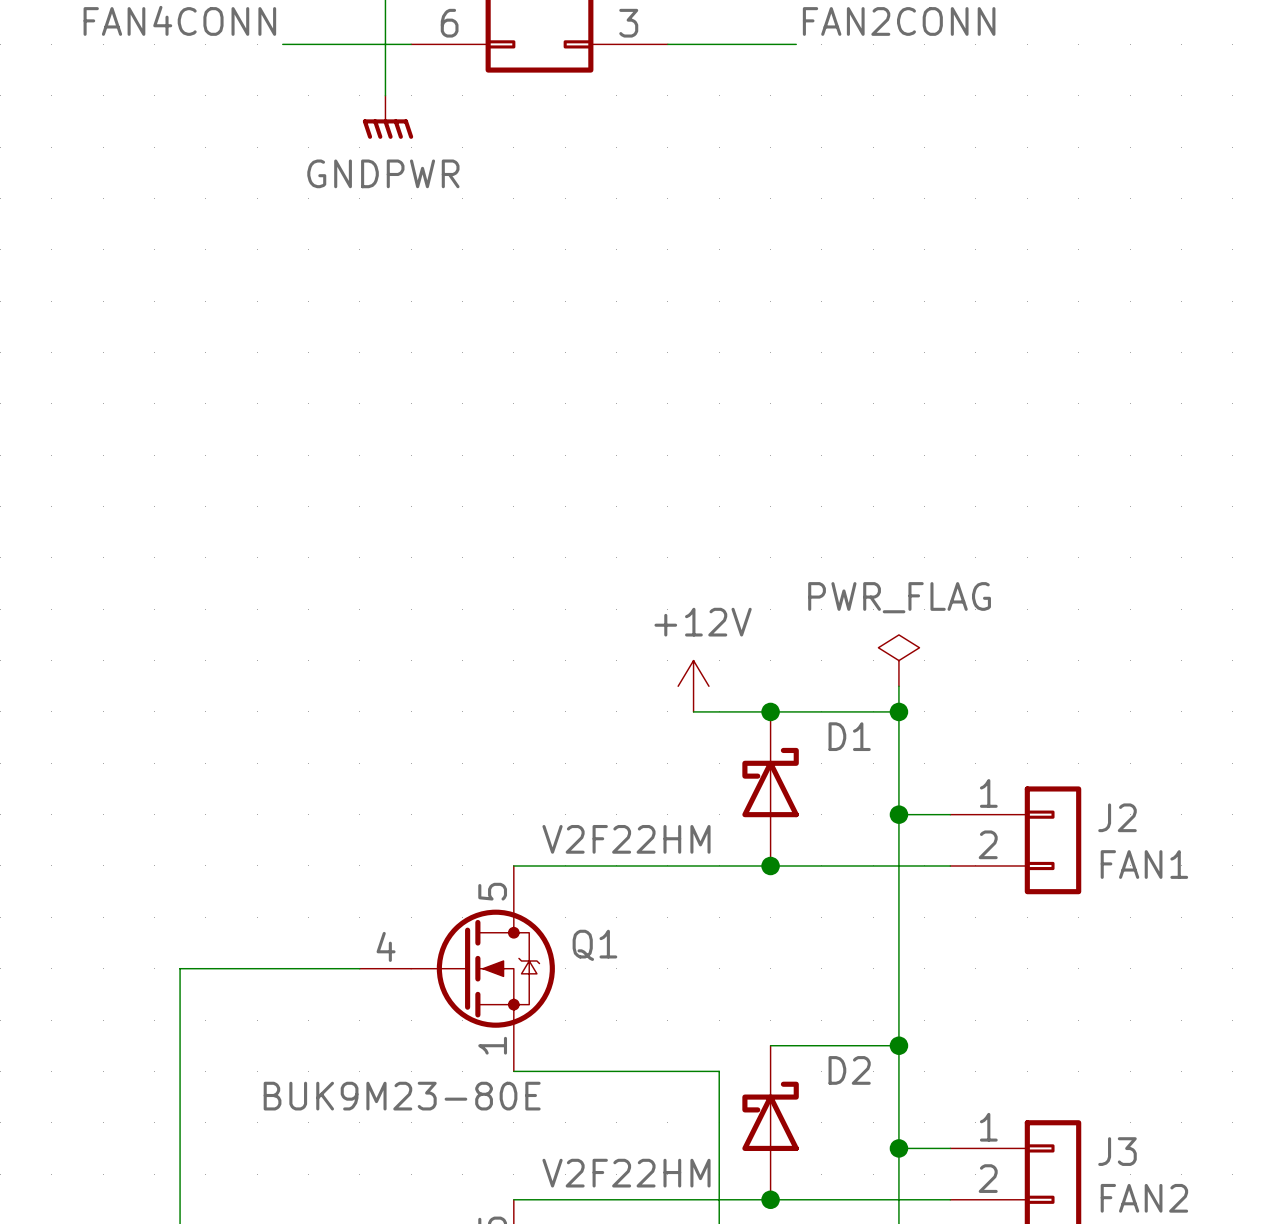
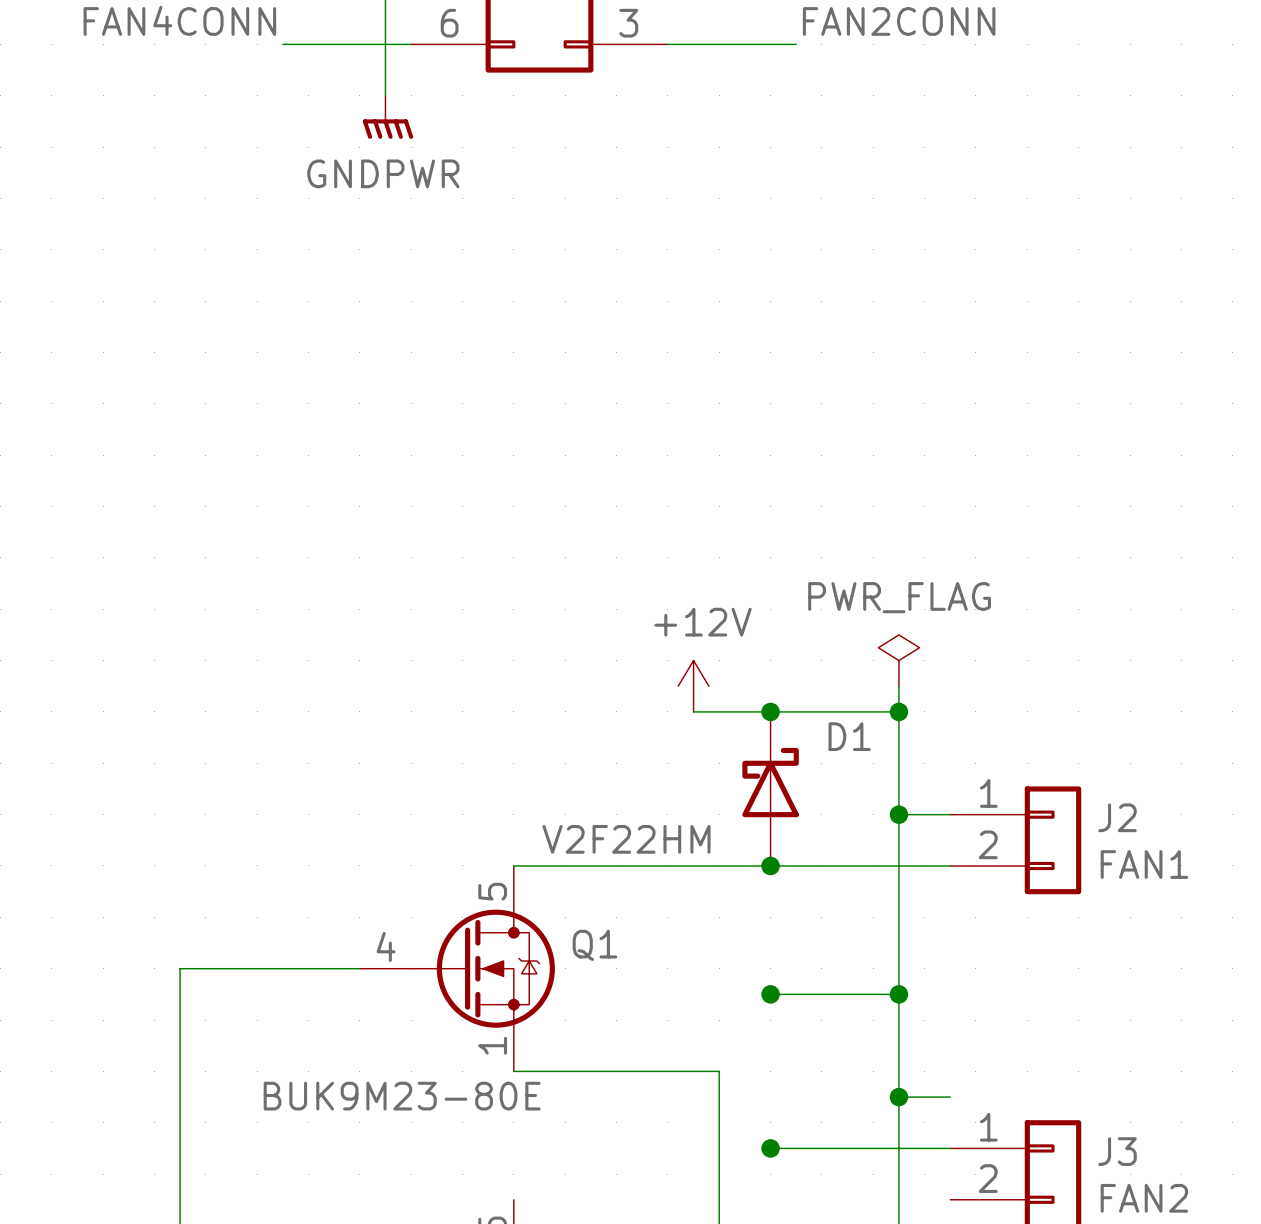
junction: none -> (770, 994)
junction: none -> (898, 994)
wire: (770, 1045) (898, 1045) -> (770, 994) (898, 994)
junction: (898, 1045) -> none
wire: none -> (898, 1097) (950, 1097)
junction: none -> (898, 1097)
D2: V2F22HM (770, 1122) -> none
wire: none -> (770, 1148) (898, 1148)
junction: none -> (770, 1148)
junction: (898, 1148) -> none
wire: (513, 1199) (950, 1199) -> none
junction: (770, 1199) -> none

